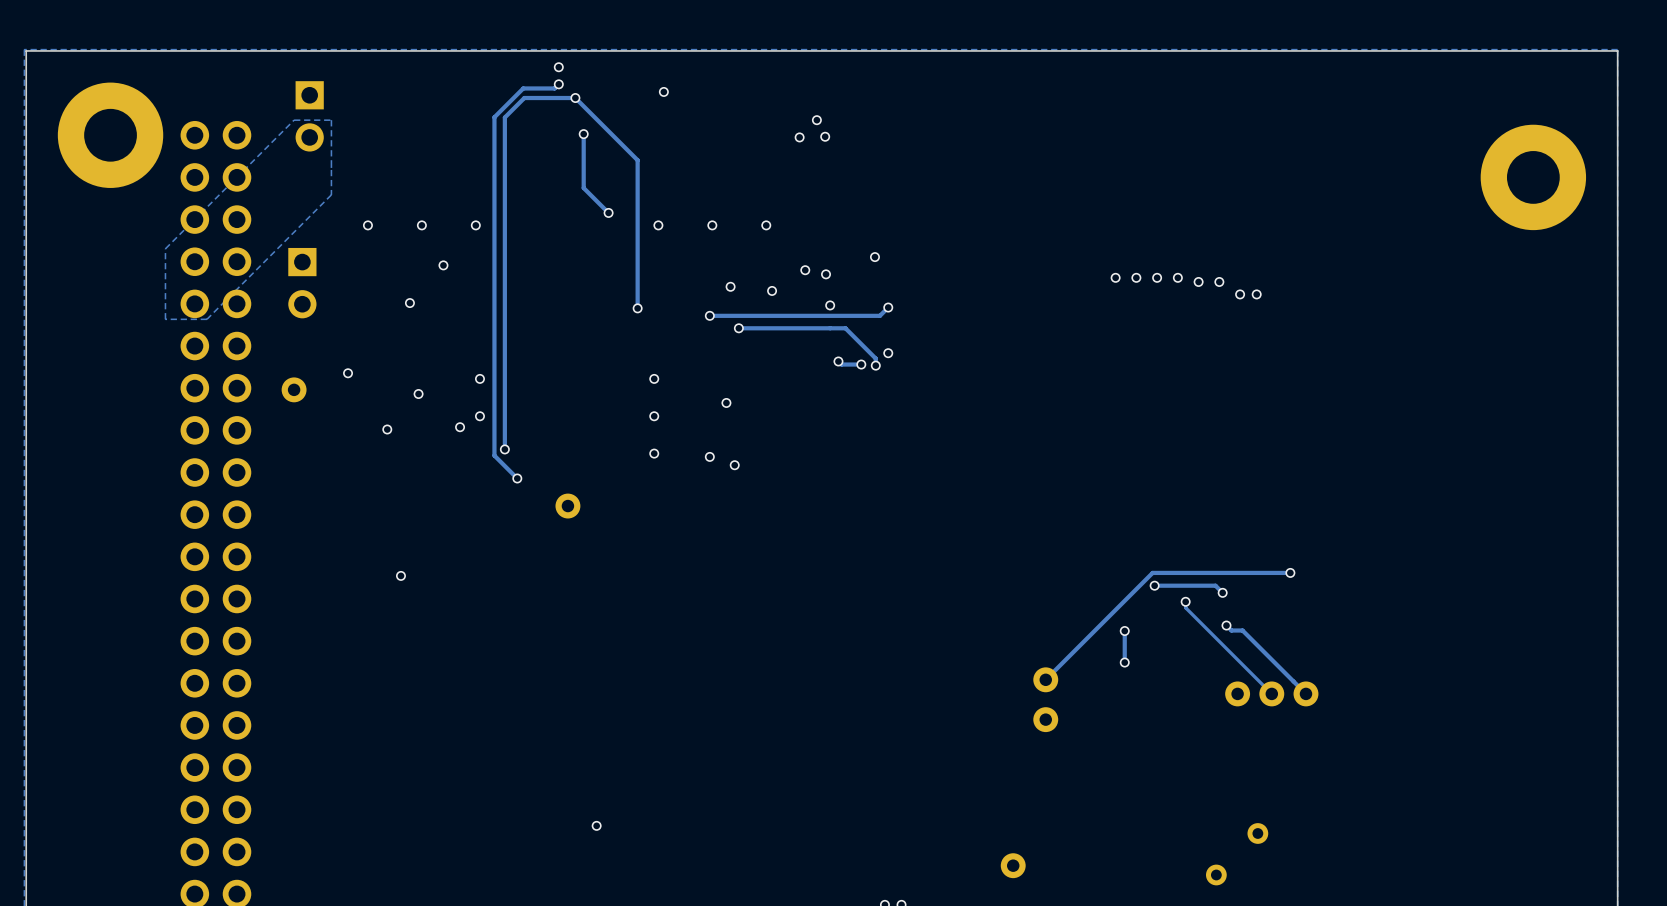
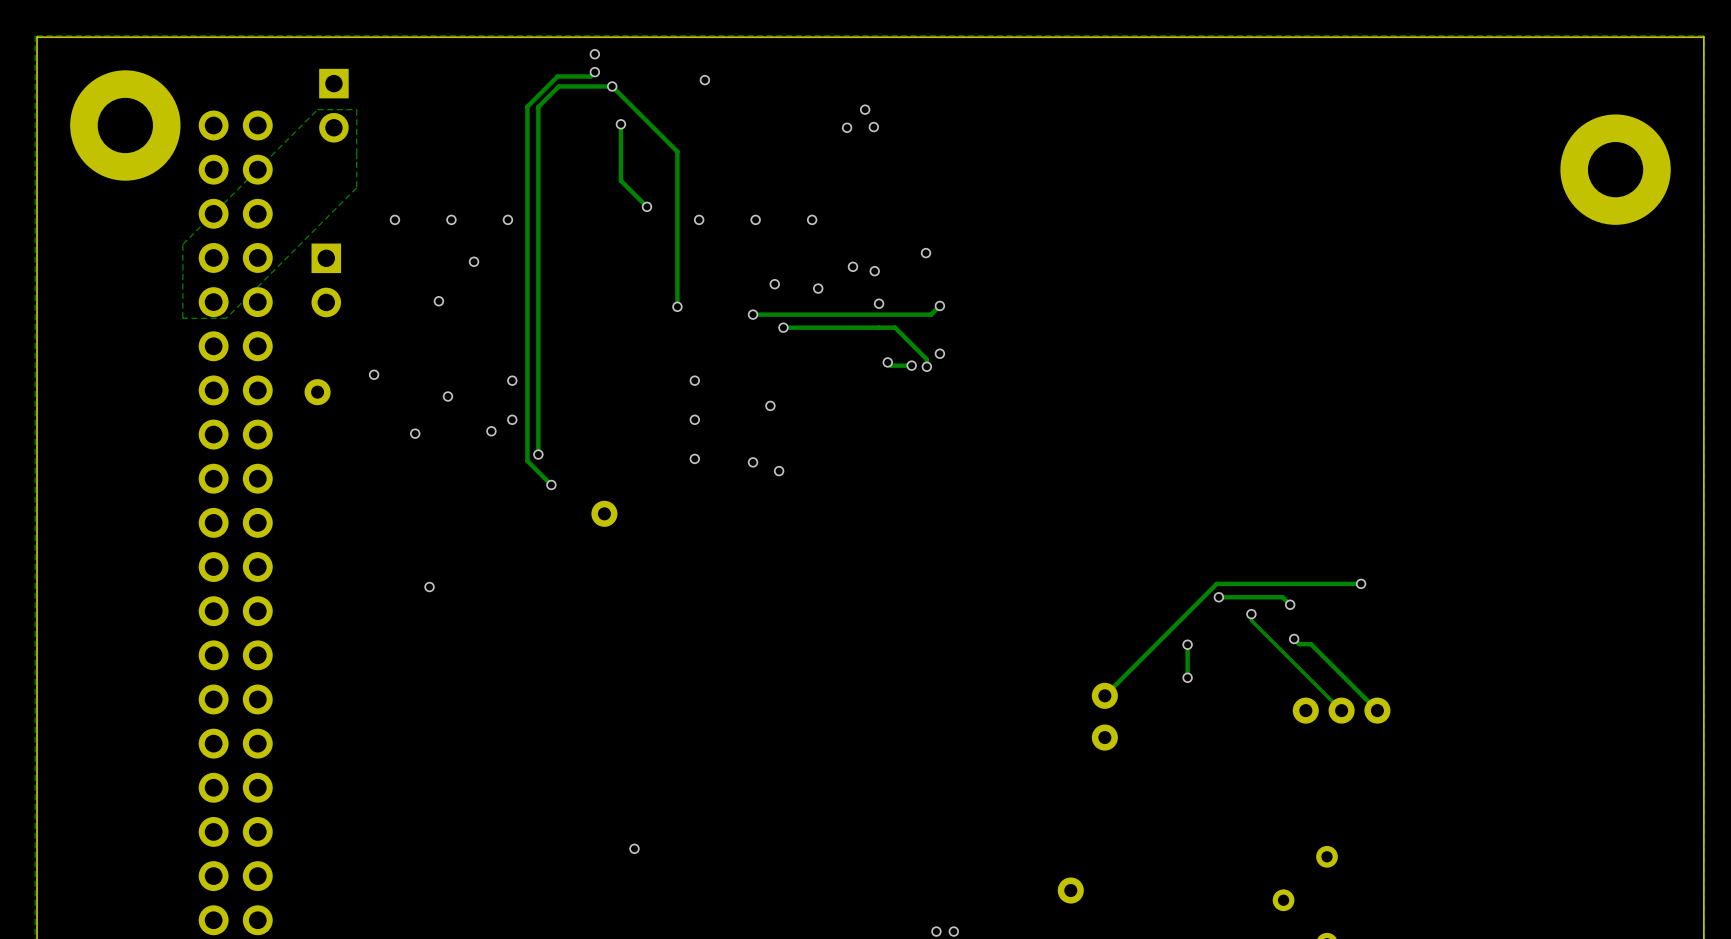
via: (1115, 277) -> none
via: (1136, 277) -> none
via: (1157, 277) -> none
via: (1177, 277) -> none
via: (1198, 281) -> none
via: (1219, 281) -> none
via: (1240, 294) -> none
via: (1256, 294) -> none

